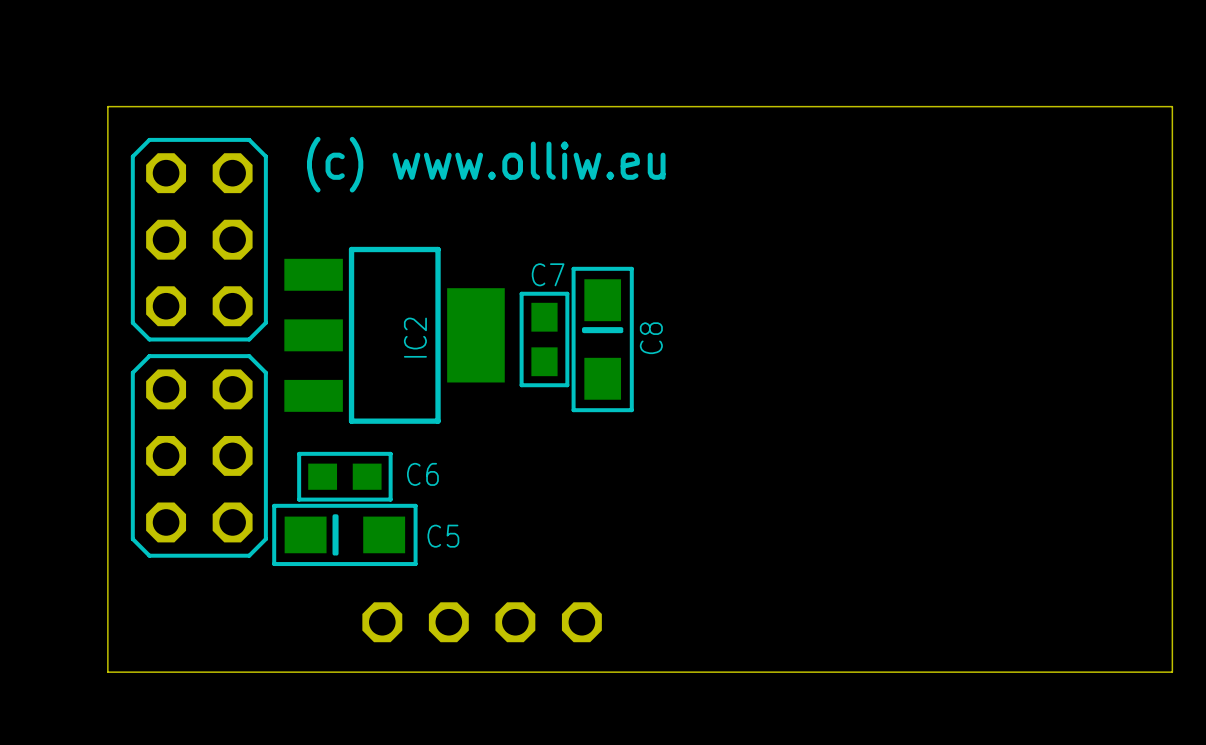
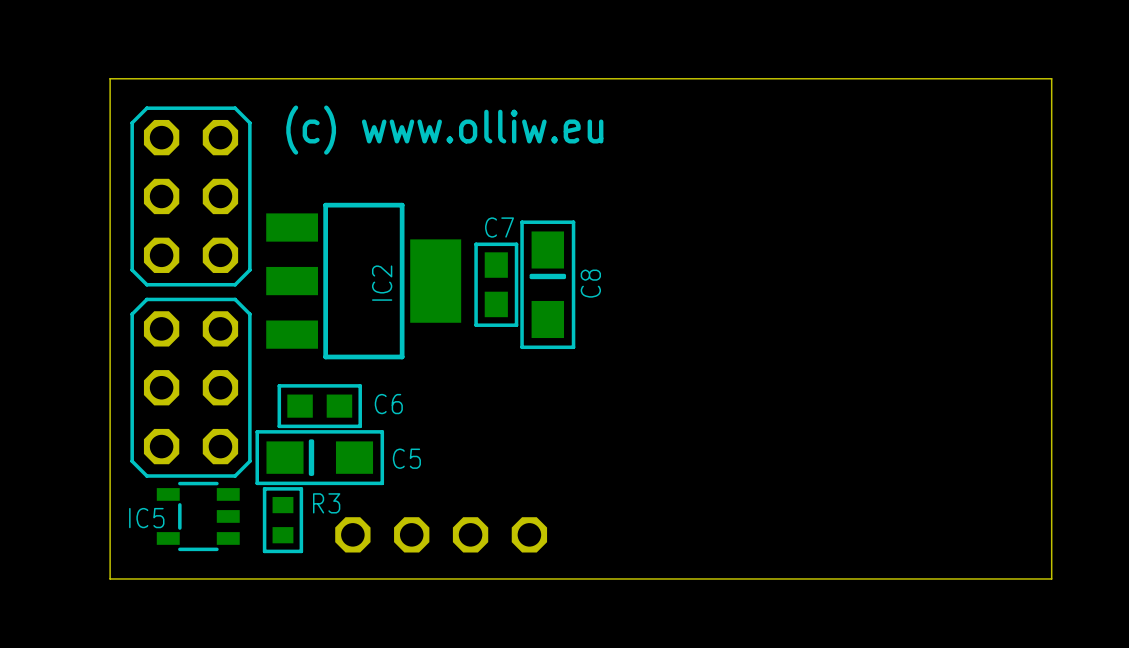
line: none -> (301, 488) (264, 488) (264, 551) (301, 551) (301, 488)
IC5: none -> (198, 516)
R3: none -> (282, 520)

